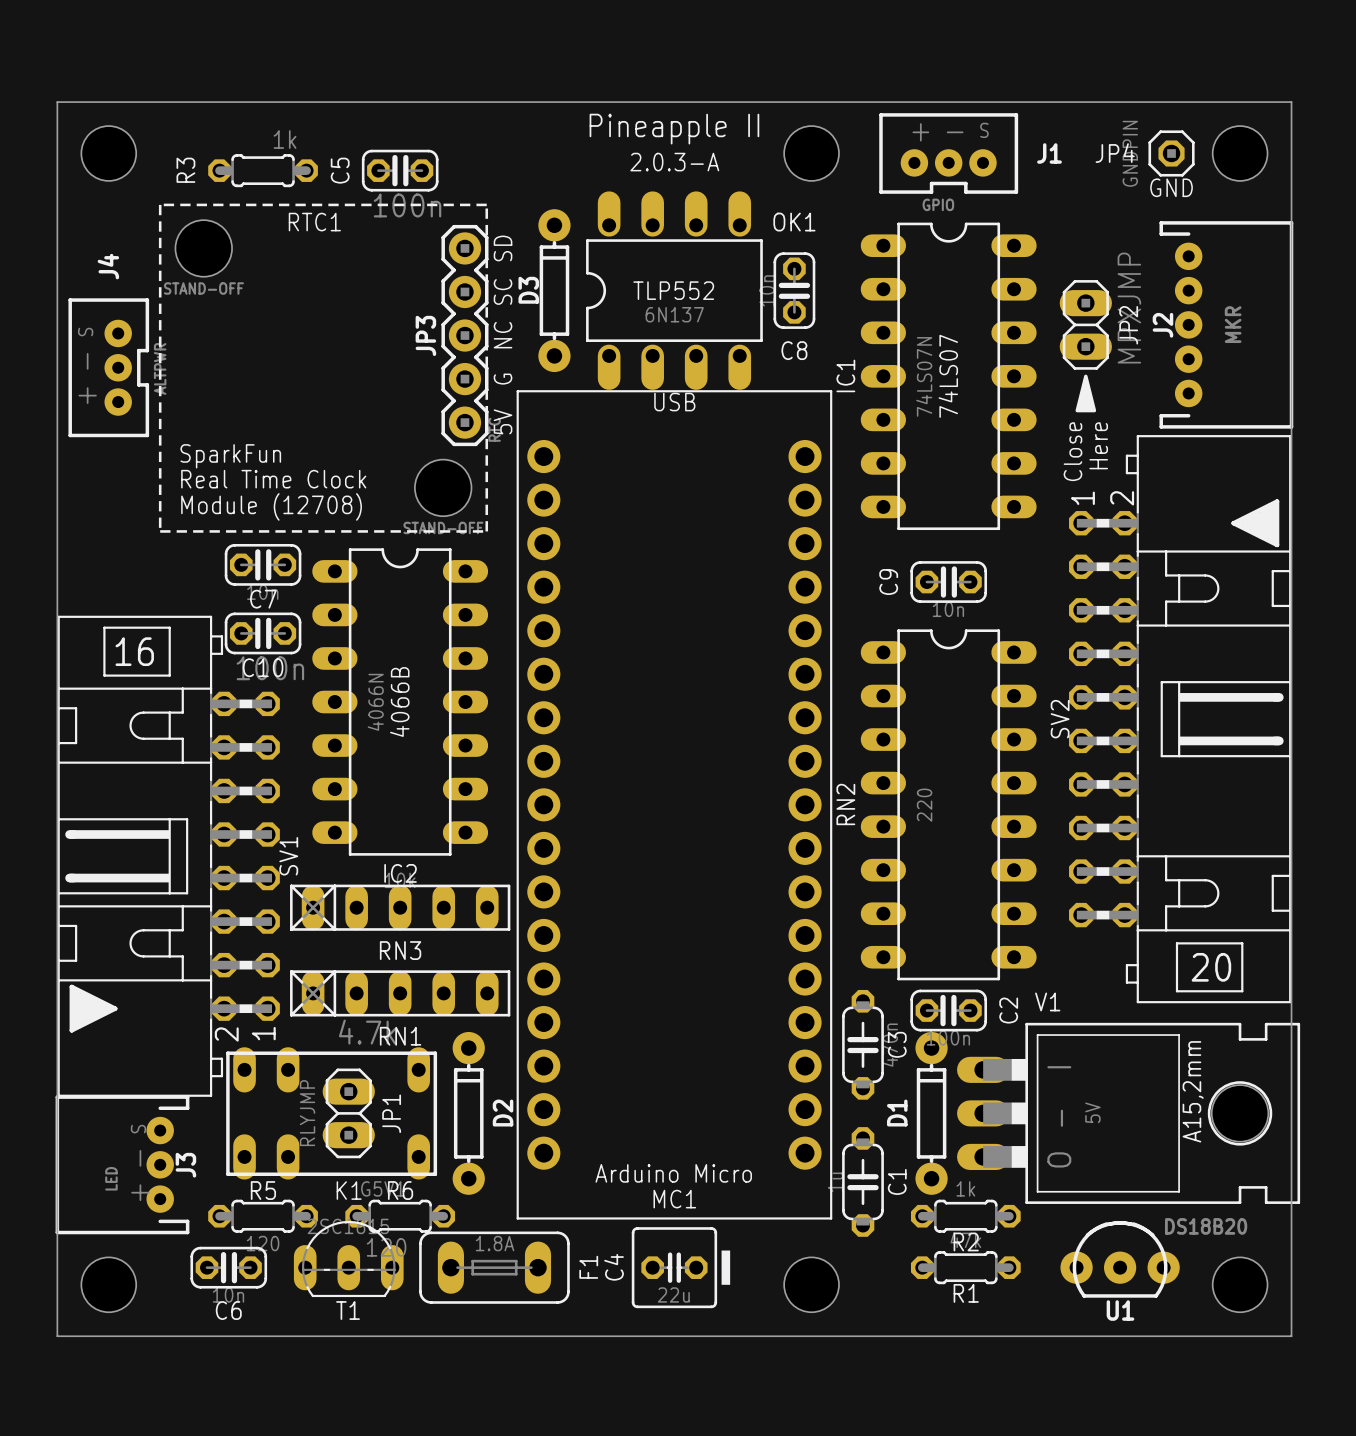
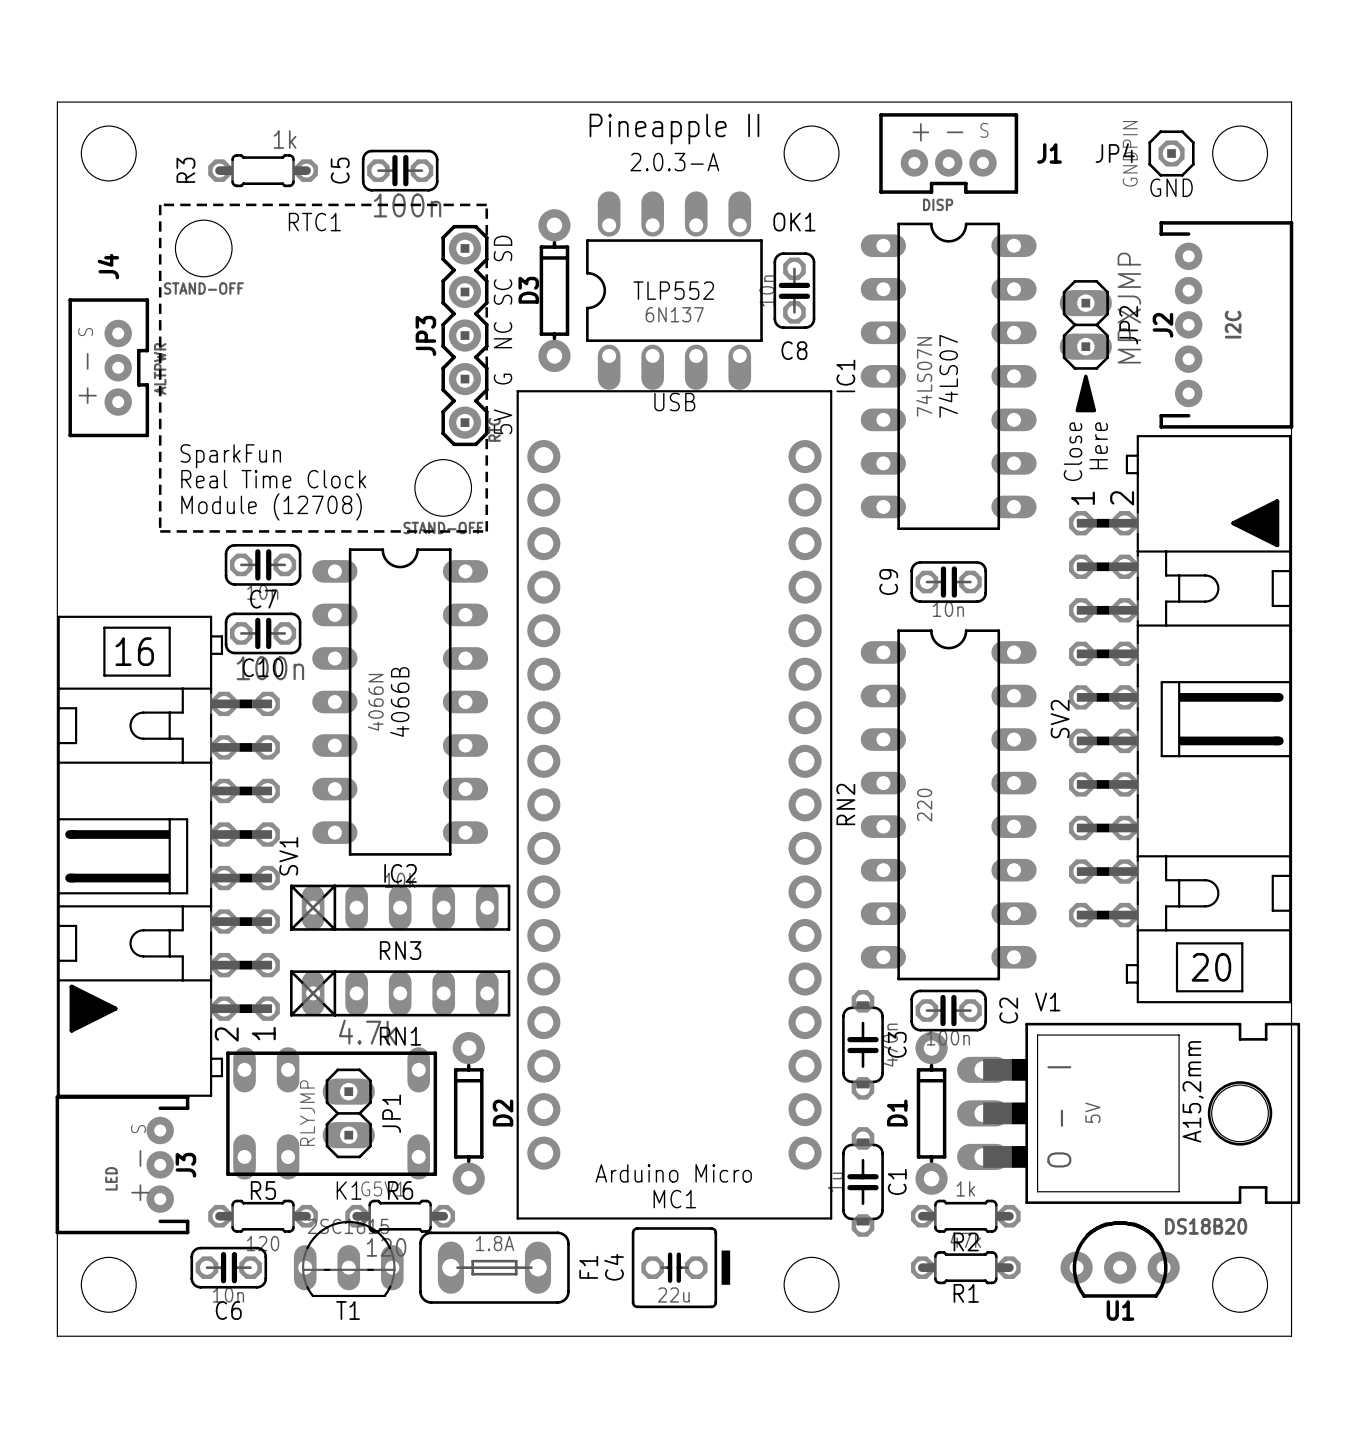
J1 value: GPIO (938, 204) -> DISP (938, 204)
J2 value: MKR (1233, 324) -> I2C (1233, 324)

